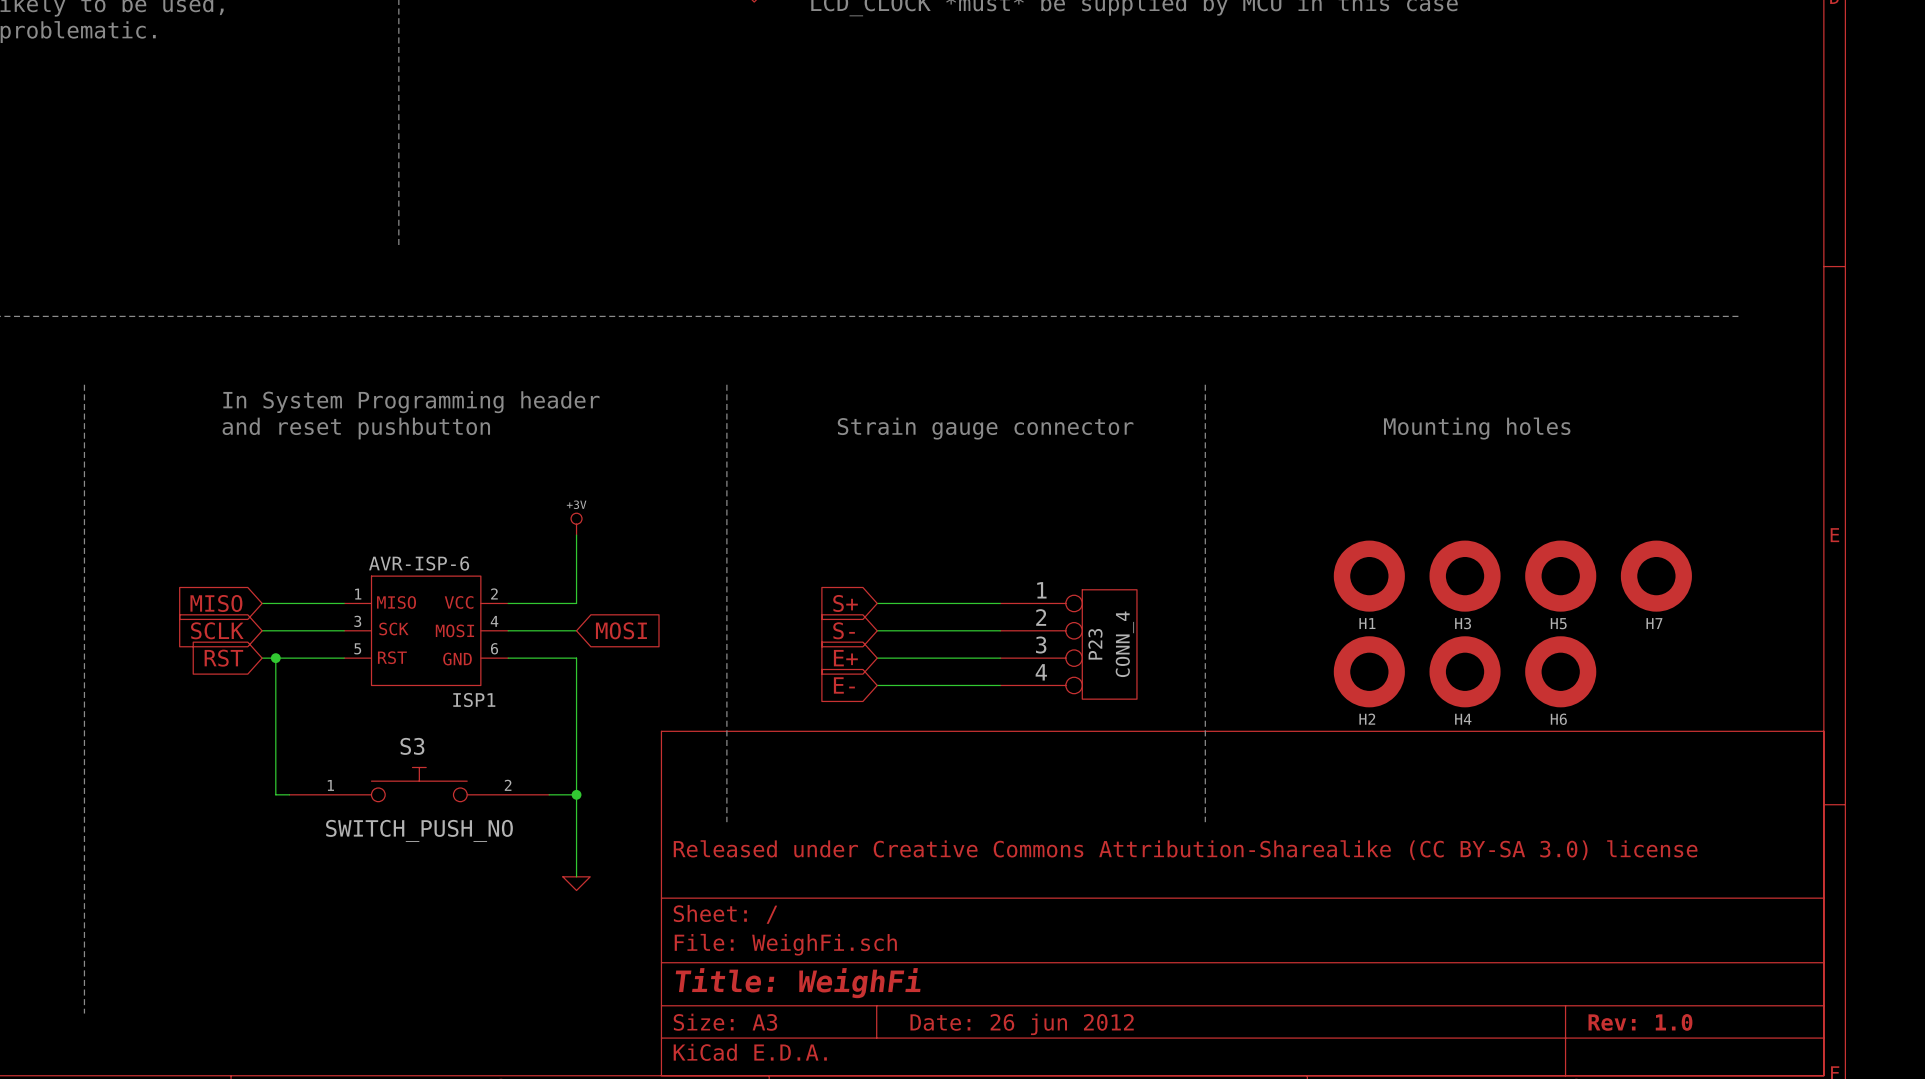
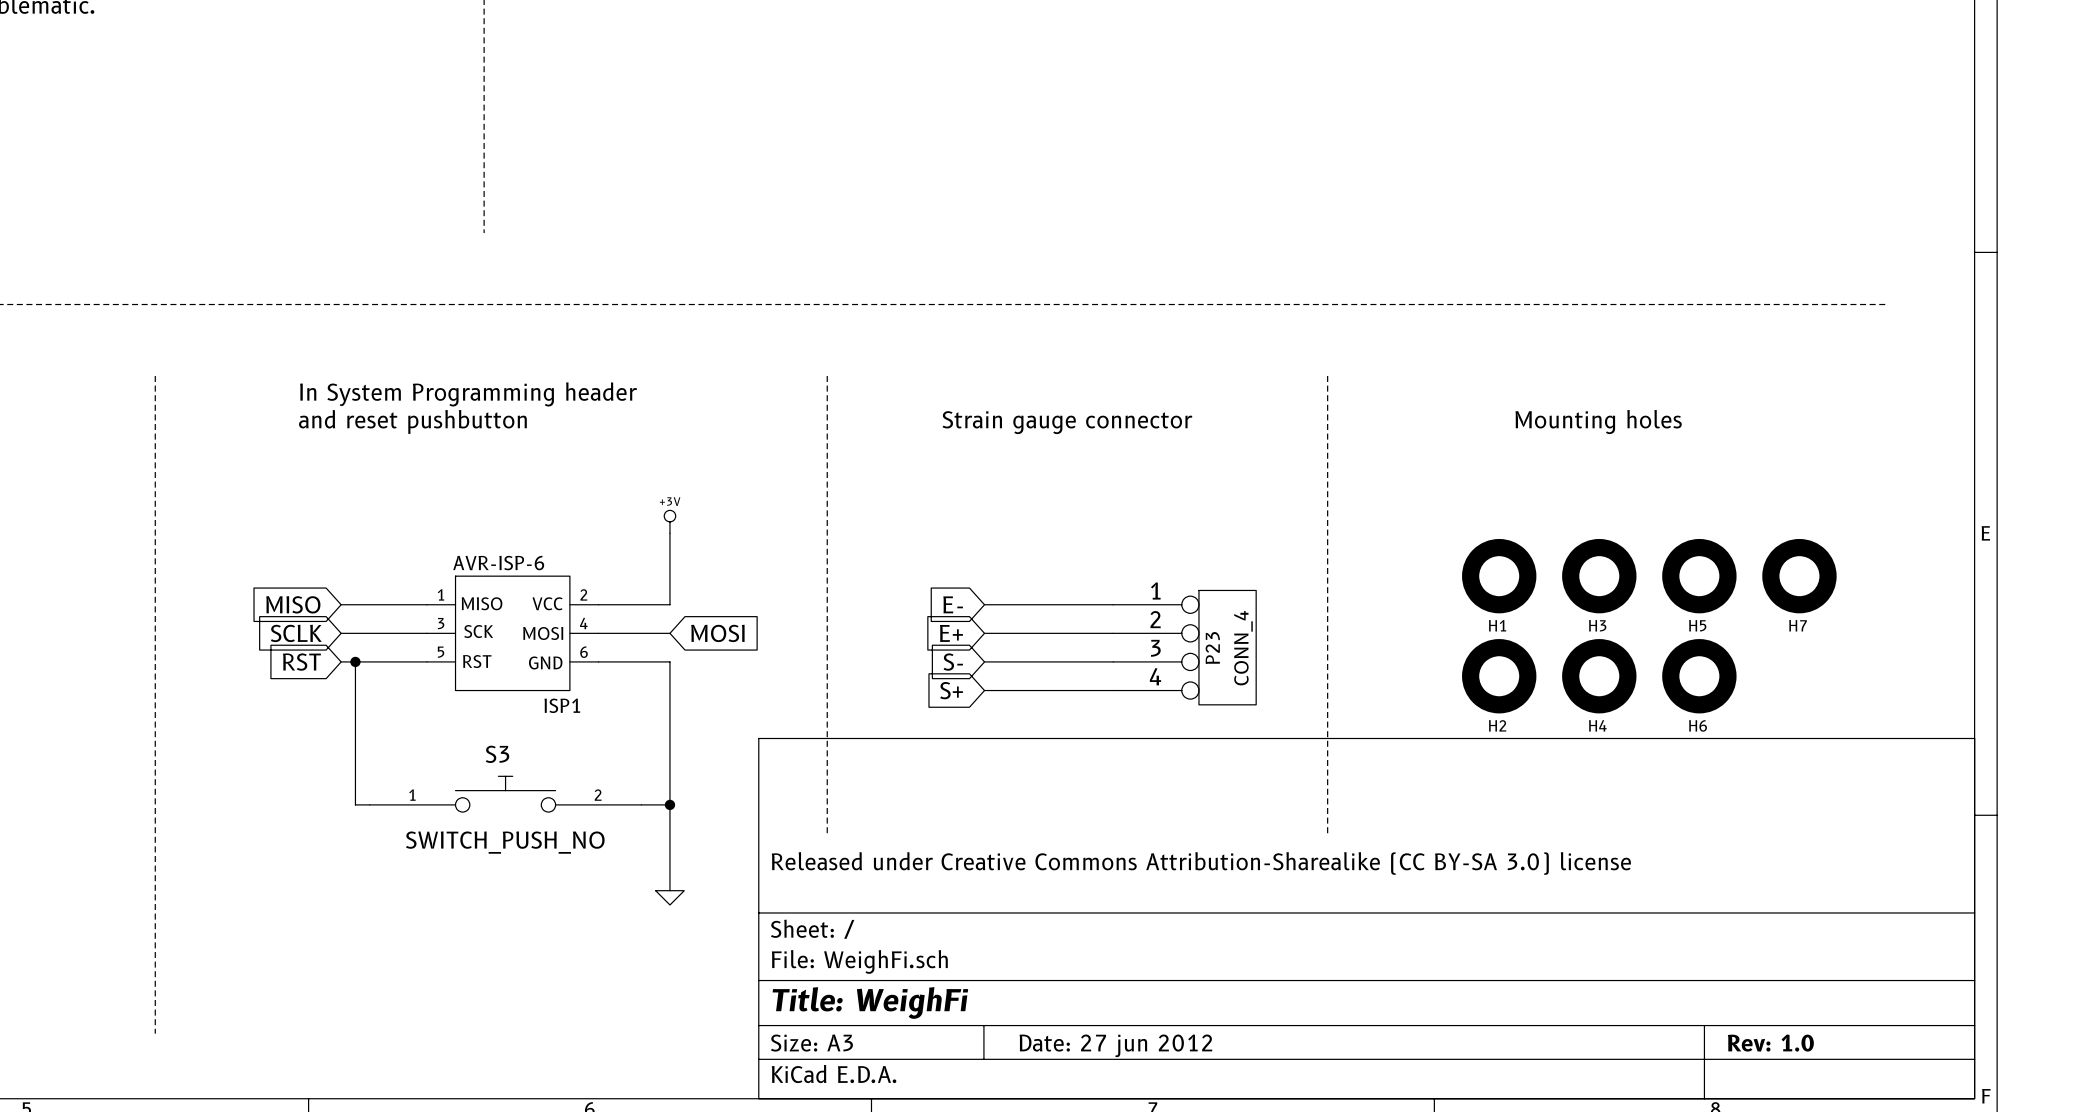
global label: S+ (845, 603) -> E- (953, 604)
global label: S- (844, 630) -> E+ (951, 633)
global label: E+ (845, 658) -> S- (953, 662)
global label: E- (844, 685) -> S+ (951, 690)
title block: Date: 26 jun 2012 (1022, 1024) -> Date: 27 jun 2012 (1115, 1045)

